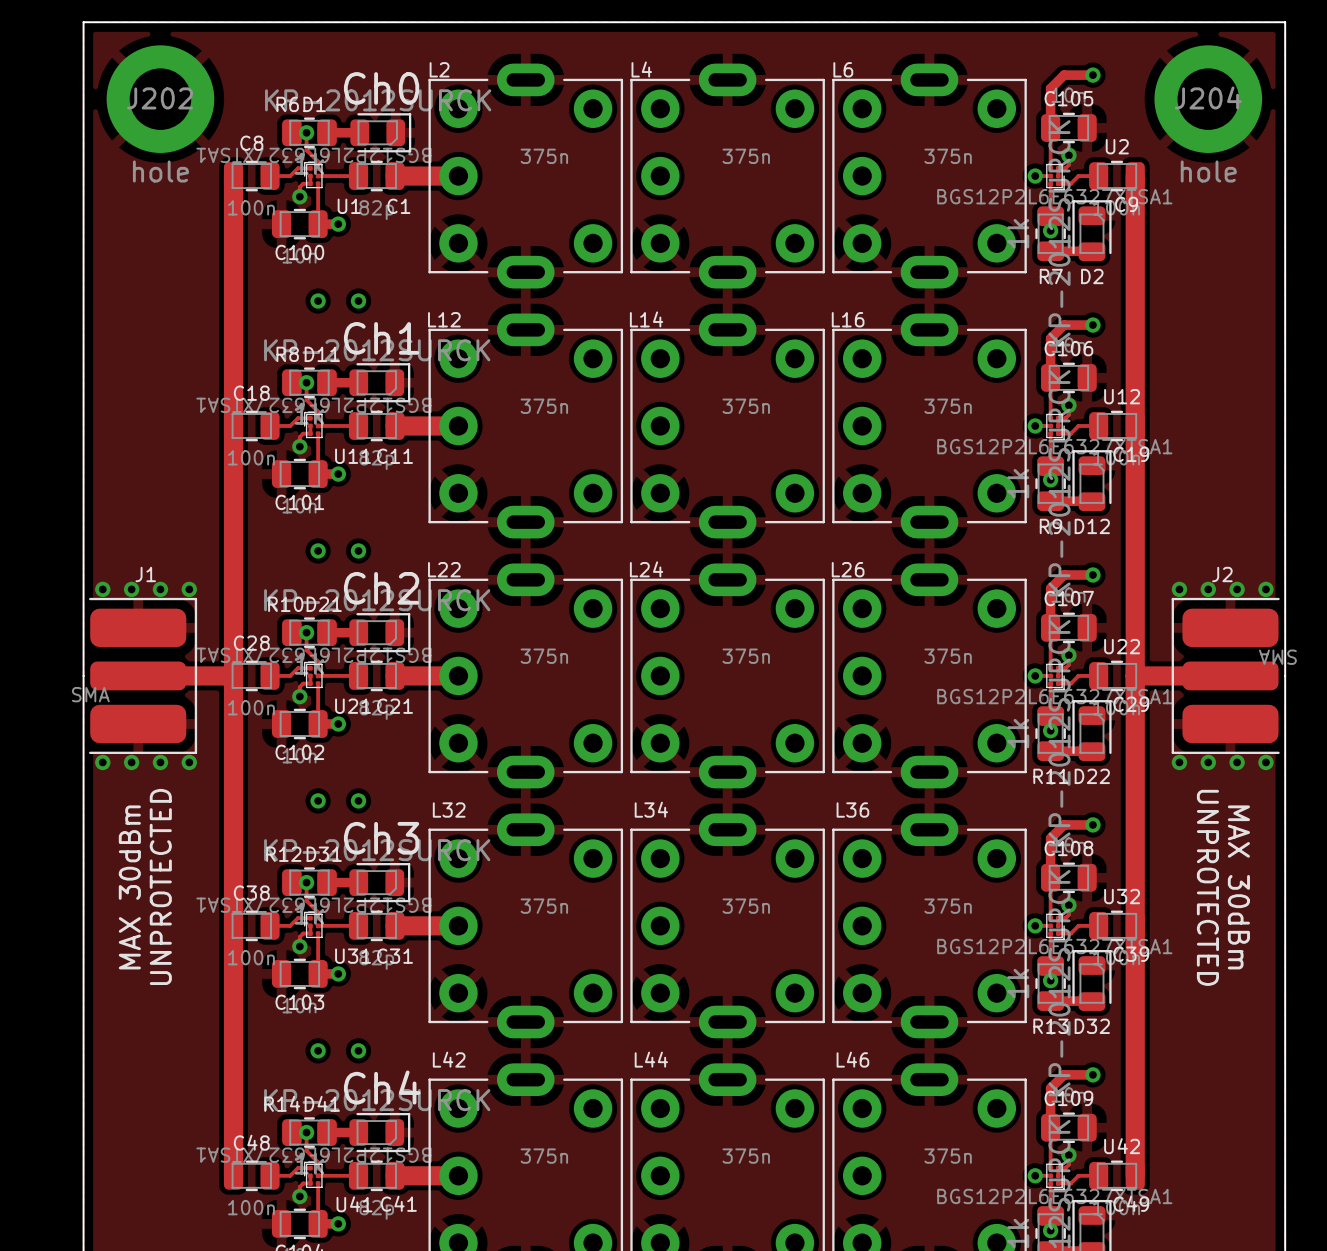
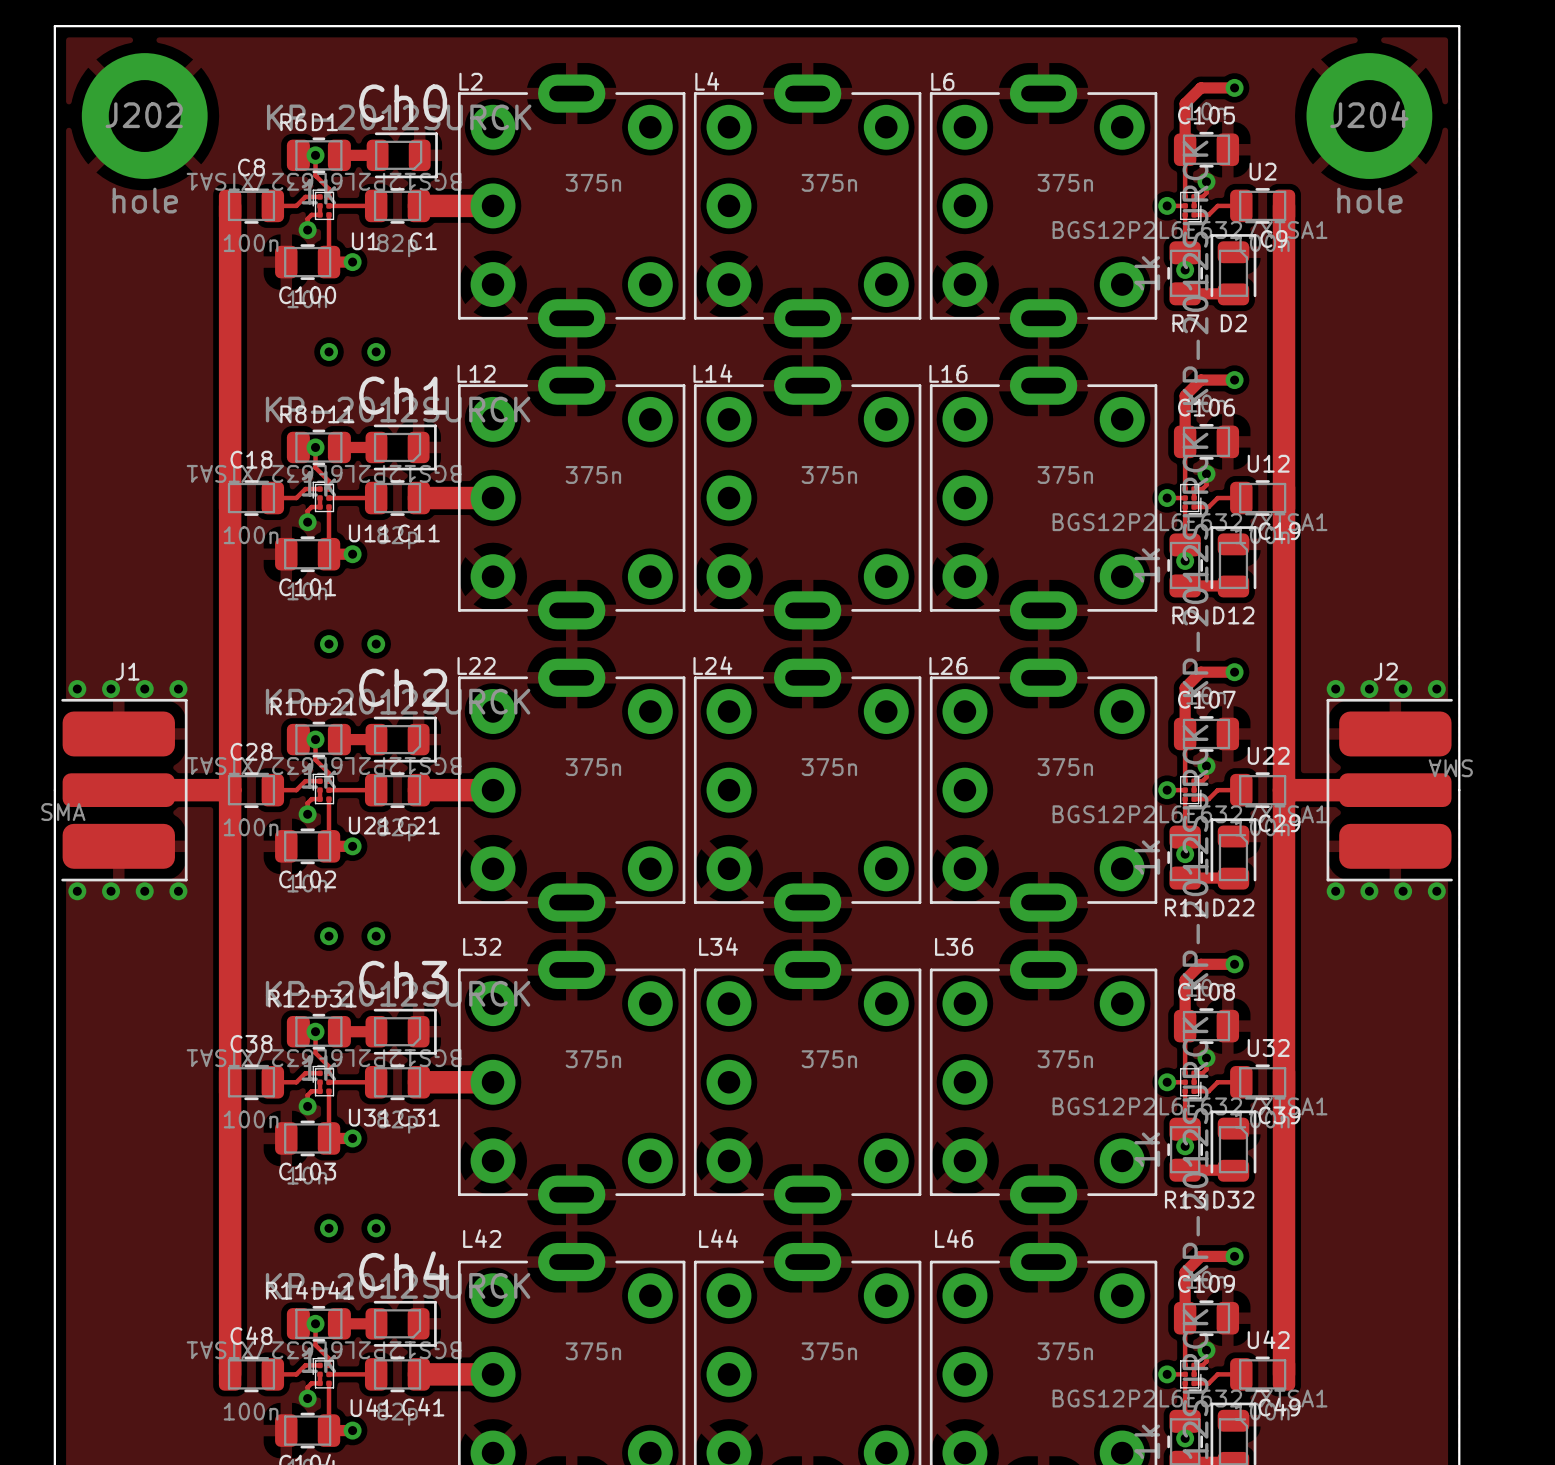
text: UNPROTECTED (160, 886) -> none
text: MAX 30dBm (129, 887) -> none
text: UNPROTECTED (1207, 887) -> none
text: MAX 30dBm (1238, 887) -> none

